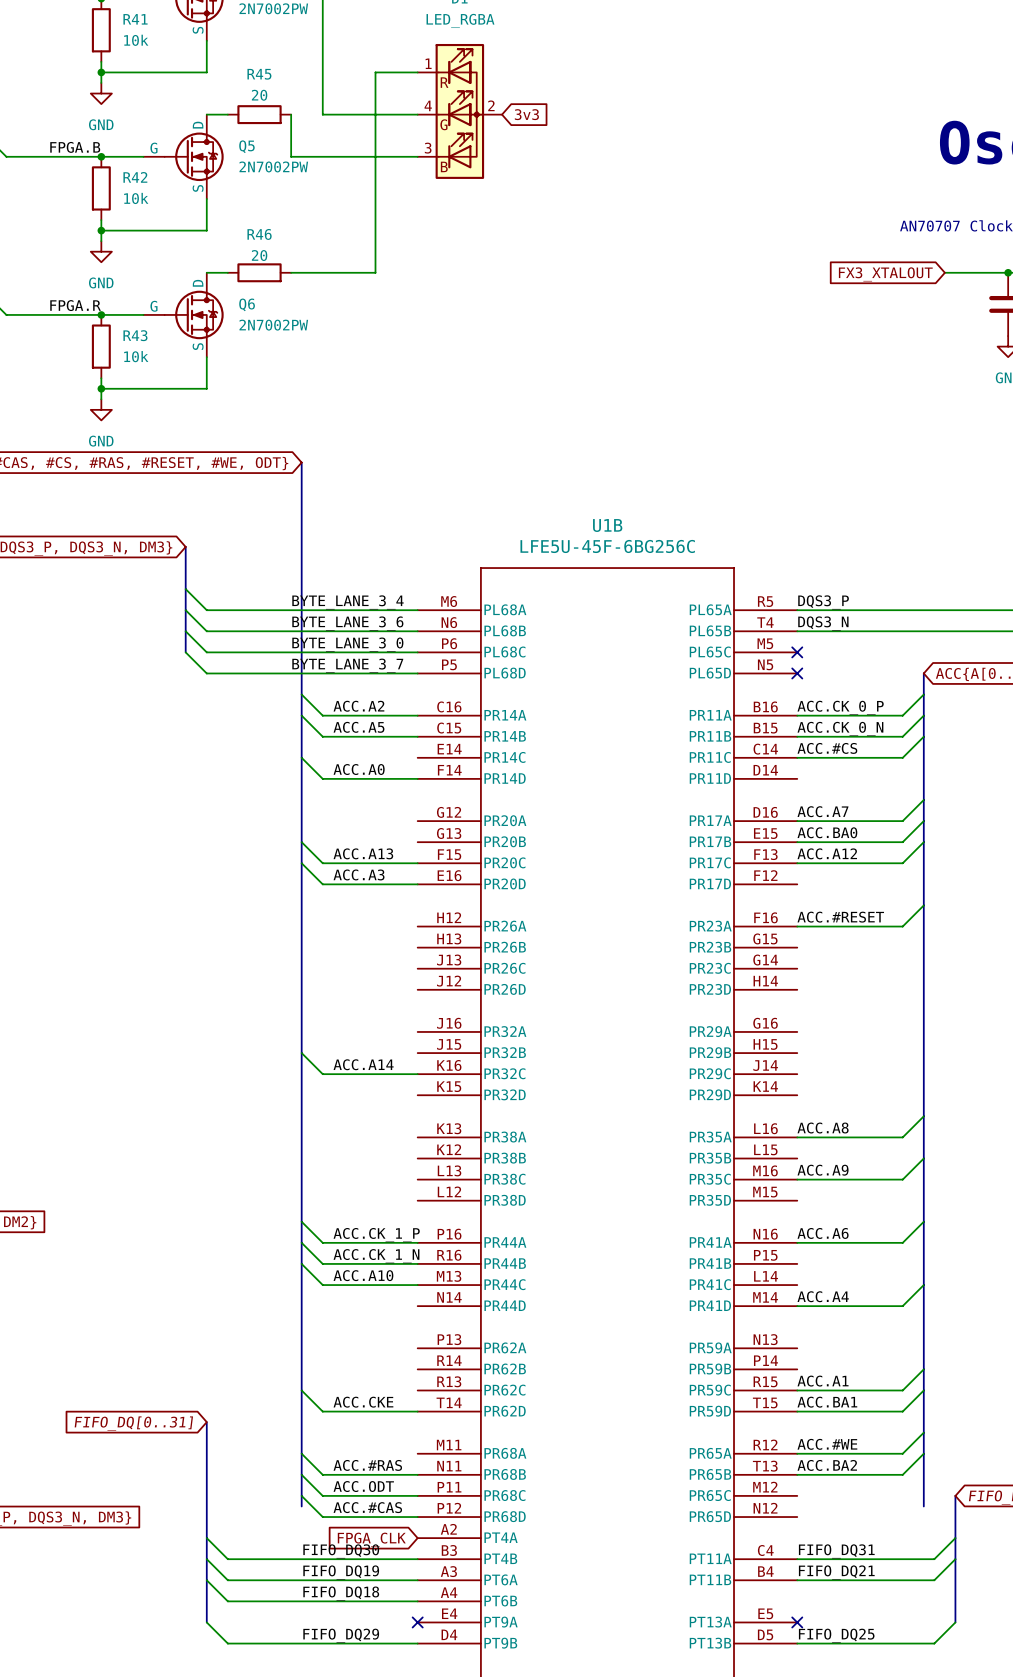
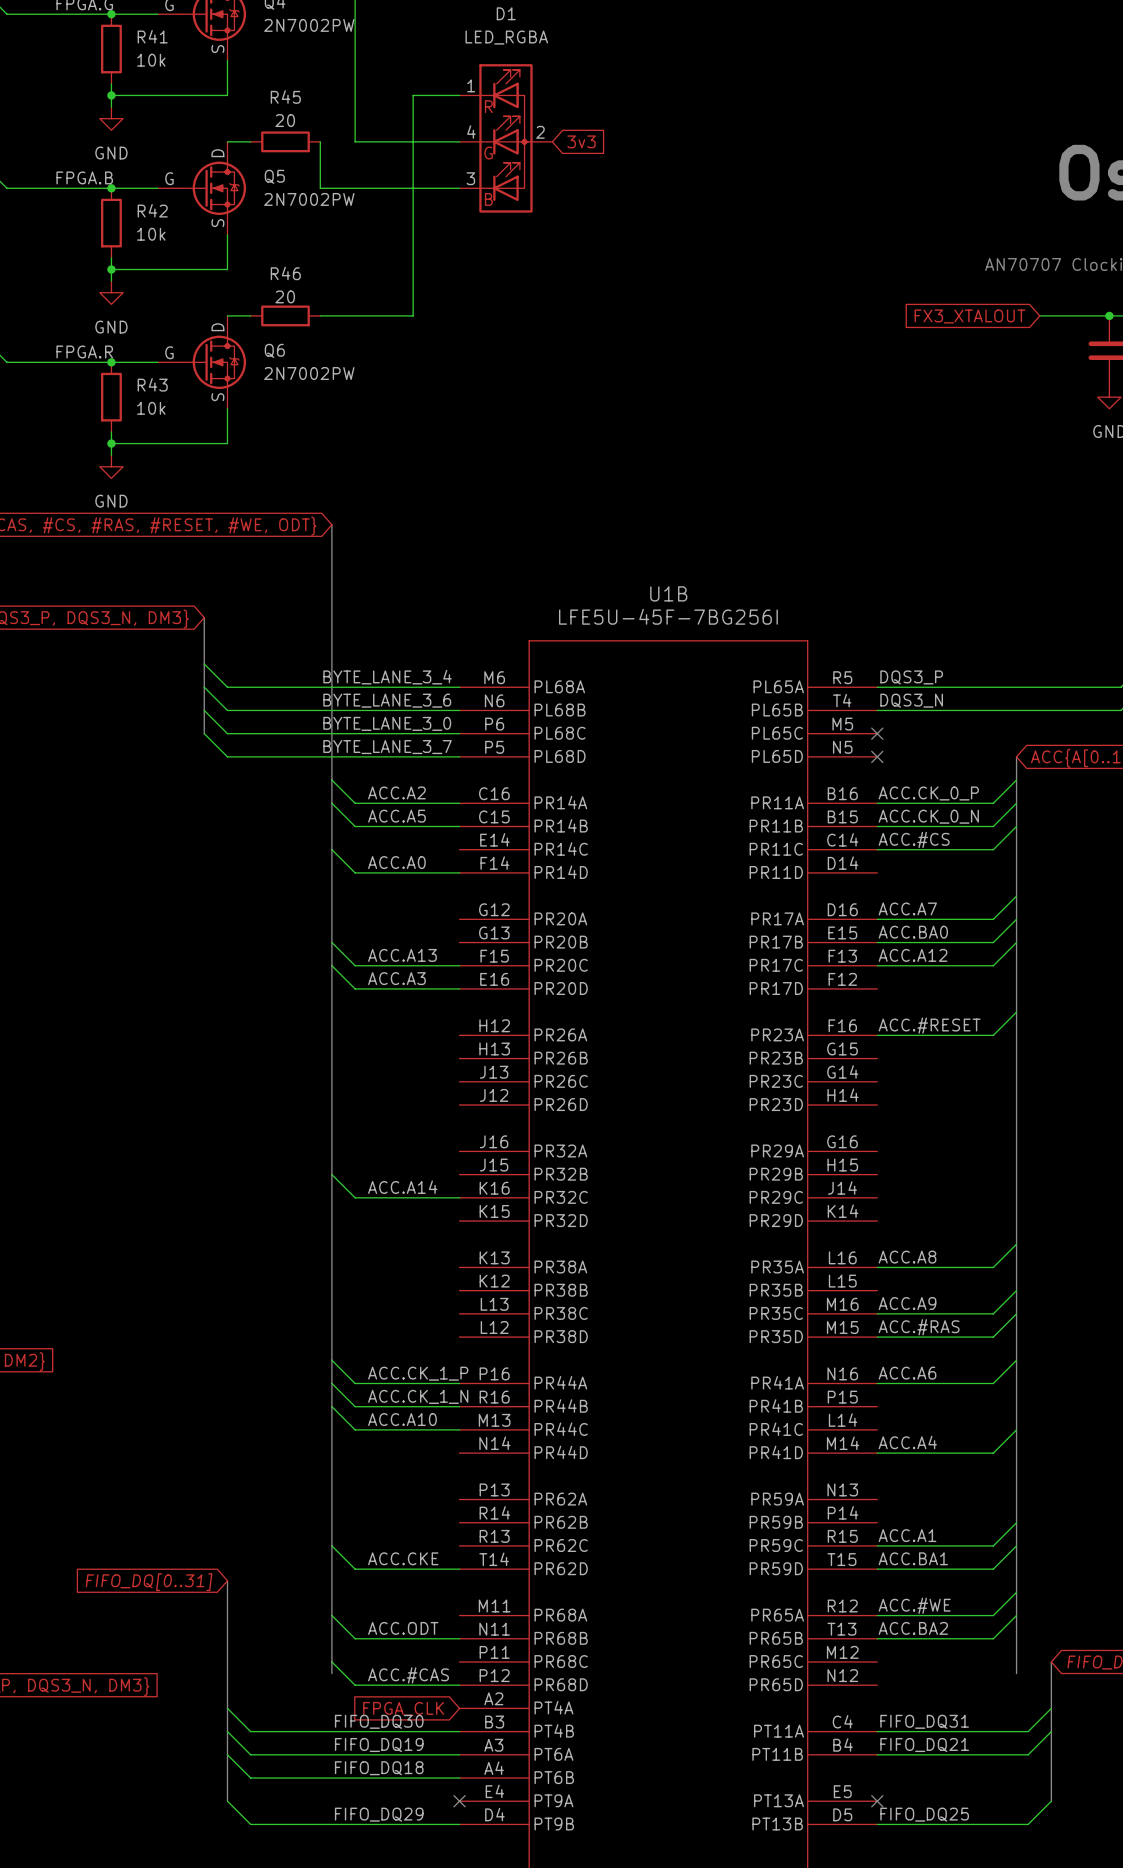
U1B value: LFE5U-45F-6BG256C (607, 546) -> LFE5U-45F-7BG256I (668, 616)
wire: none -> (1016, 1313) (993, 1337) (877, 1337)
label: none -> ACC.#RAS (919, 1327)
label: ACC.#RAS (367, 1465) -> ACC.ODT (403, 1628)
wire: (301, 1474) (322, 1495) (417, 1495) -> none
label: ACC.ODT (363, 1486) -> none

